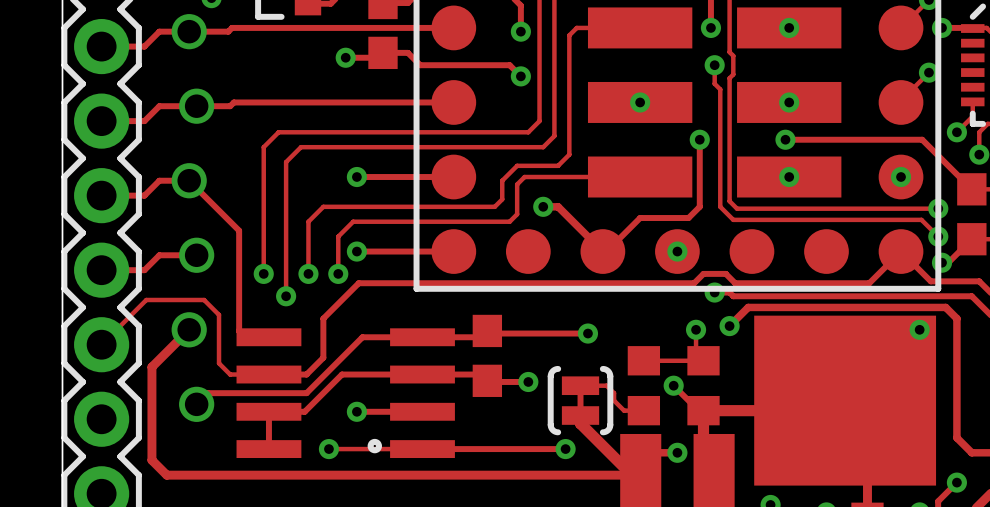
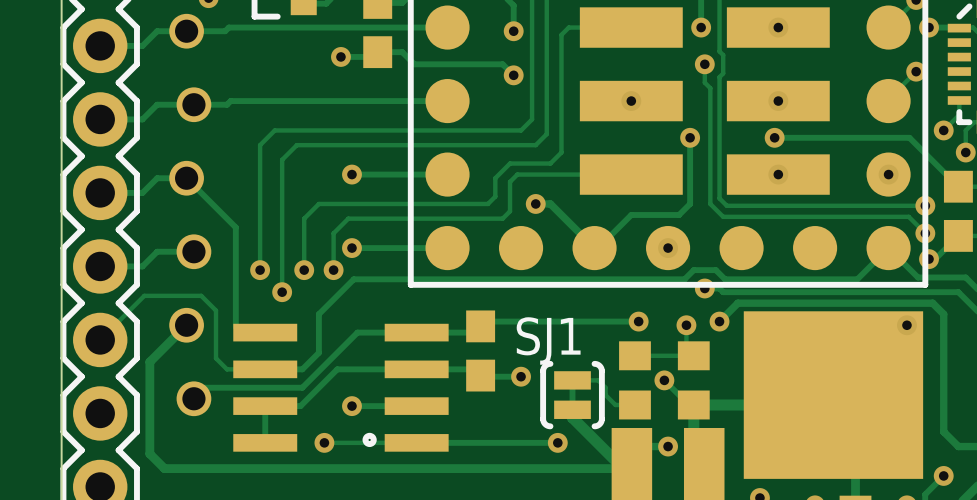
track: none -> (638, 321) (485, 321) (480, 326)
track: (489, 333) (587, 333) -> none
via position: (587, 333) -> (638, 321)
text: none -> SJ1 (548, 340)

